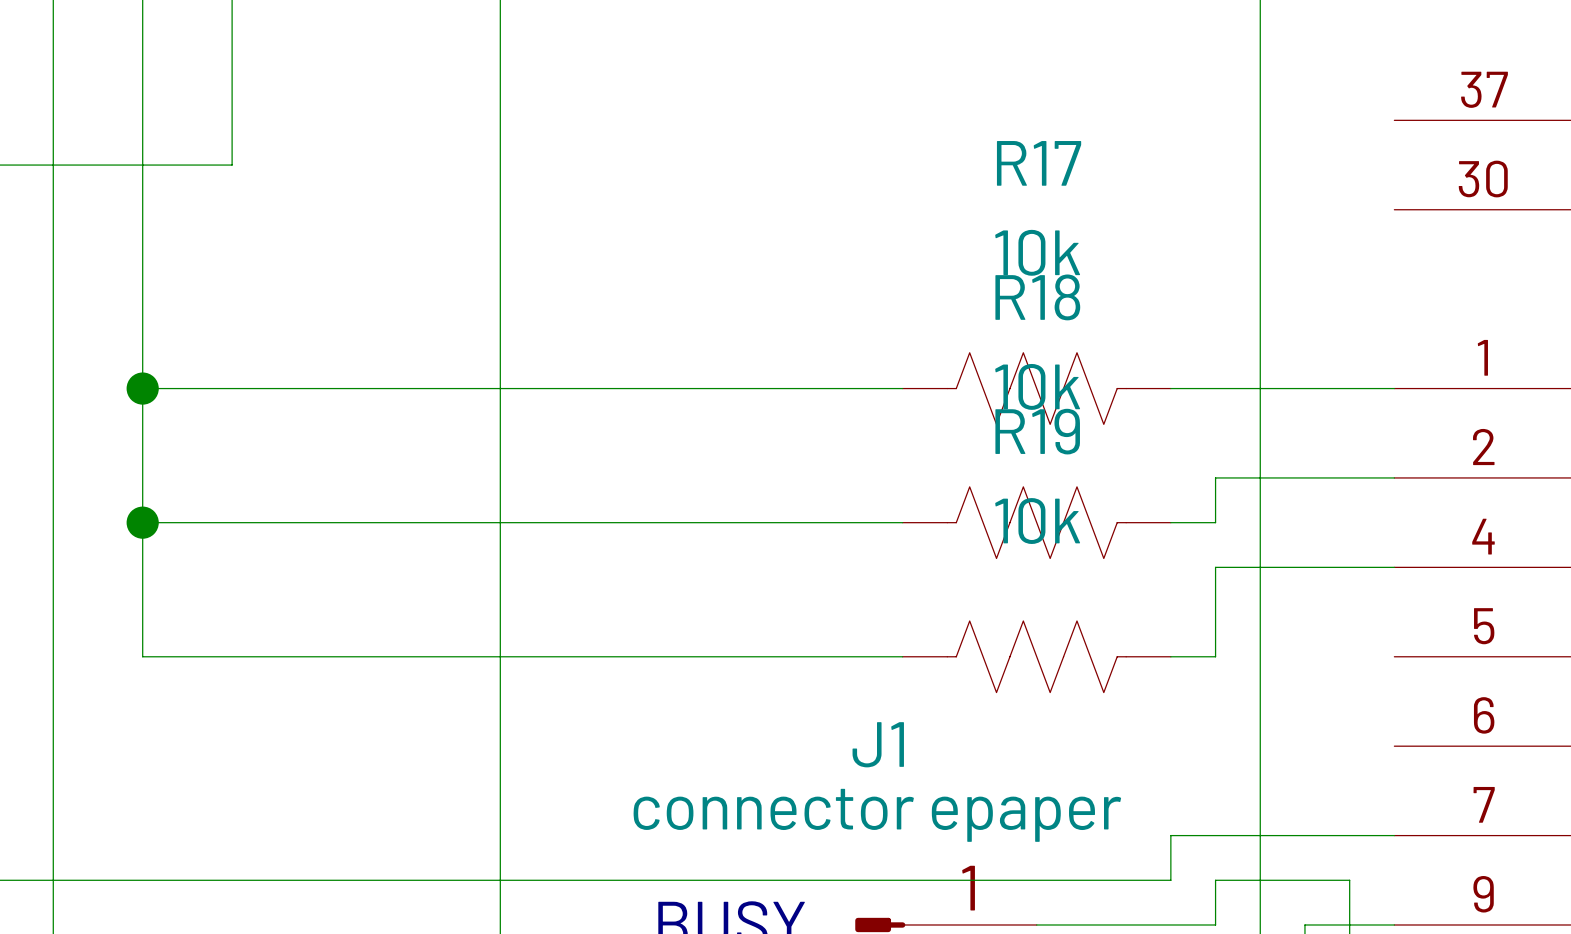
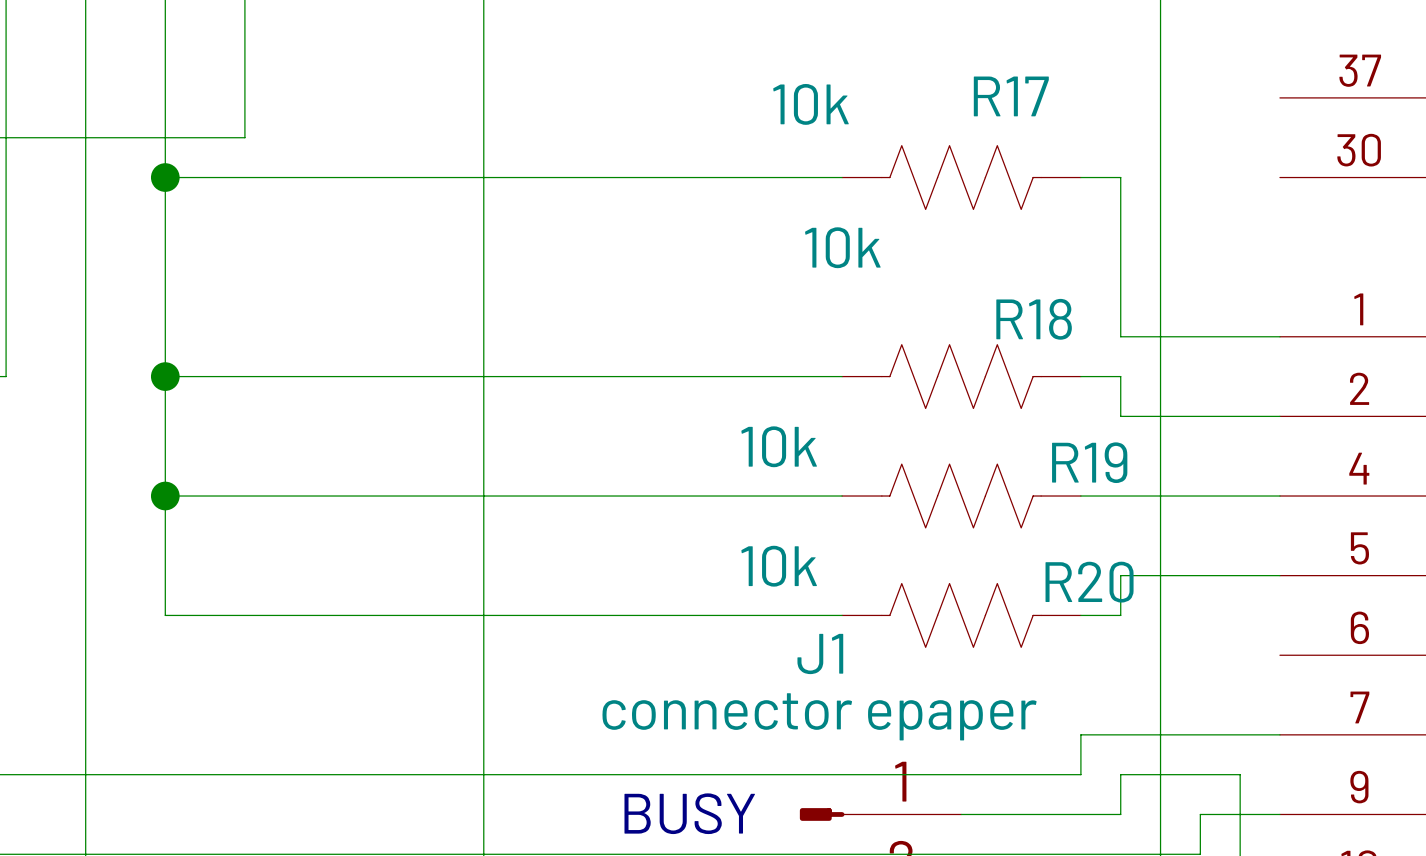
R17 name position: R17 (1039, 163) -> R17 (1011, 96)
wire: none -> (165, 177) (842, 177)
junction: none -> (165, 177)
R17 value position: 10k (1037, 252) -> 10k (811, 104)
R18 name position: R18 (1037, 297) -> R18 (1034, 319)
R18 value position: 10k (1037, 386) -> 10k (842, 247)
wire: (142, 388) (902, 388) -> (165, 376) (842, 376)
junction: (142, 388) -> none
R17 position: (1036, 388) -> (961, 177)
wire: (1170, 388) (1215, 388) -> (1080, 177) (1120, 177) (1120, 336)
R19 name position: R19 (1037, 431) -> R19 (1089, 462)
junction: none -> (165, 376)
wire: (1215, 477) (1215, 522) (1170, 522) -> (1120, 416) (1120, 376) (1080, 376)
R19 value position: 10k (1037, 521) -> 10k (779, 446)
wire: (142, 522) (902, 522) -> (165, 496) (842, 496)
junction: (142, 522) -> none
R18 position: (1036, 522) -> (961, 376)
junction: none -> (165, 496)
wire: (1215, 567) (1215, 656) (1170, 656) -> (1120, 496) (1080, 496)
wire: (142, 656) (902, 656) -> (165, 575) (165, 615) (842, 615)
R19 position: (1036, 656) -> (961, 496)
wire: none -> (1279, 575) (1120, 575) (1120, 615) (1080, 615)
R20: none -> 10k (961, 615)

